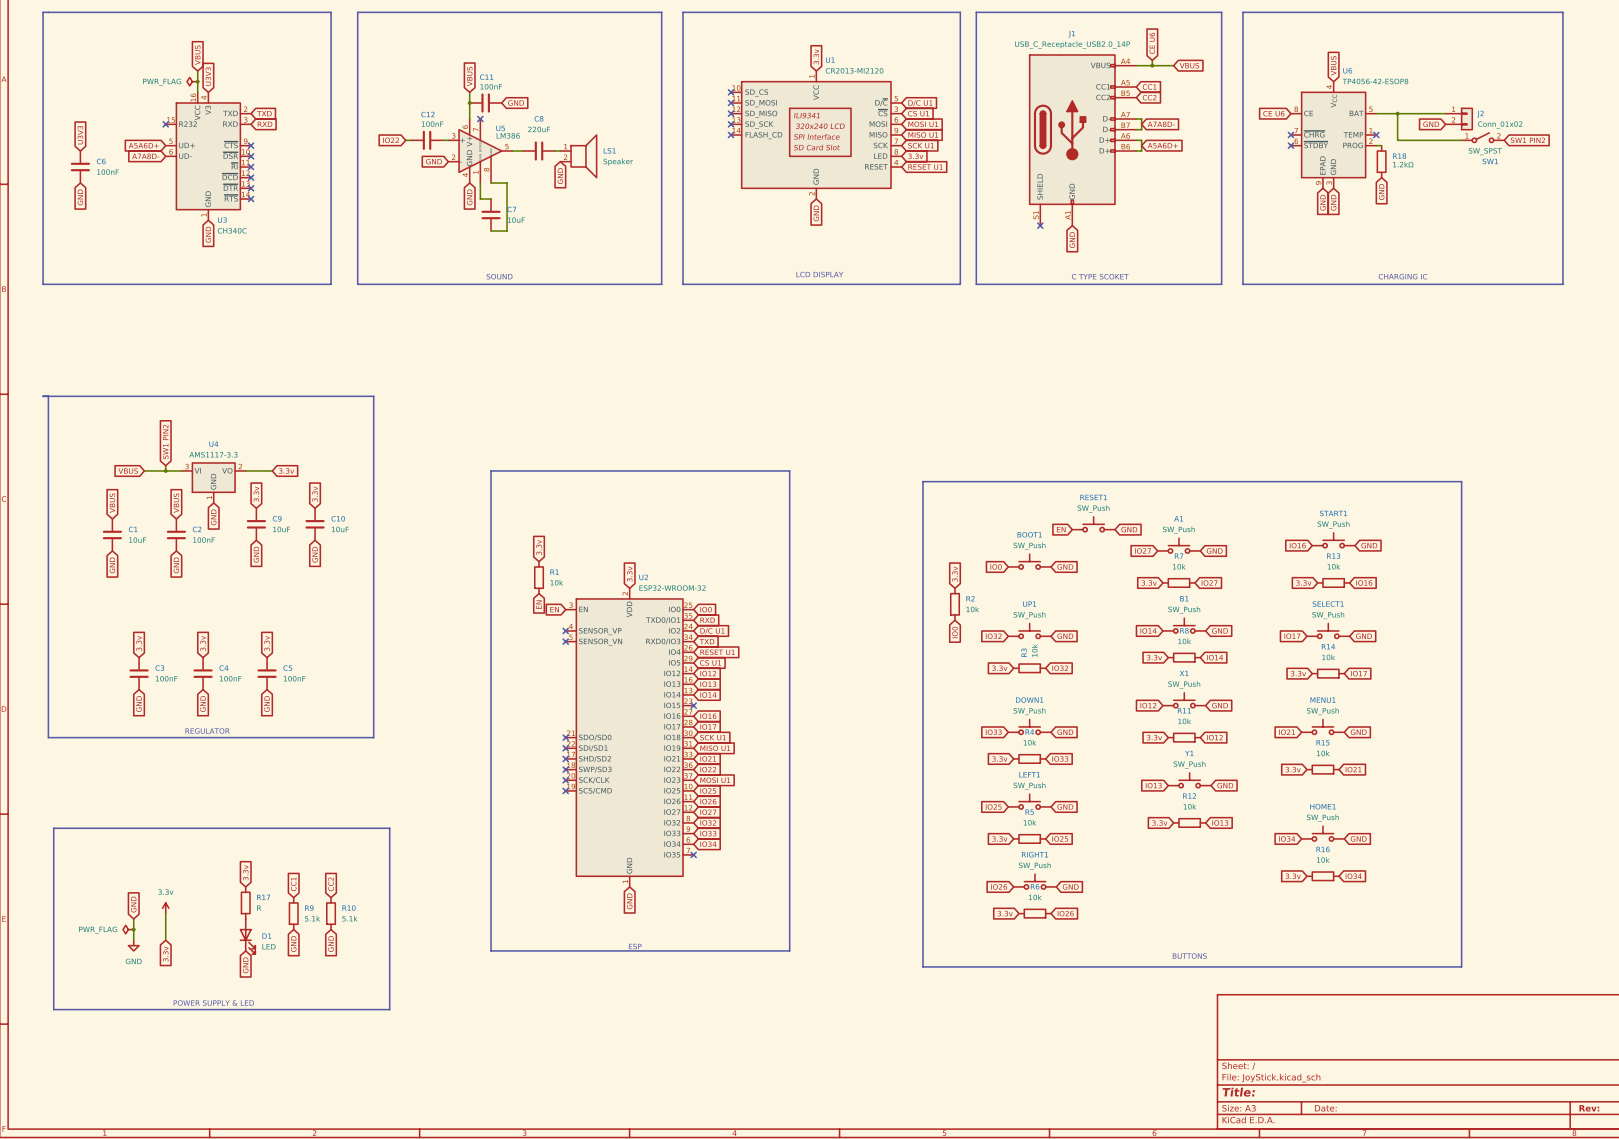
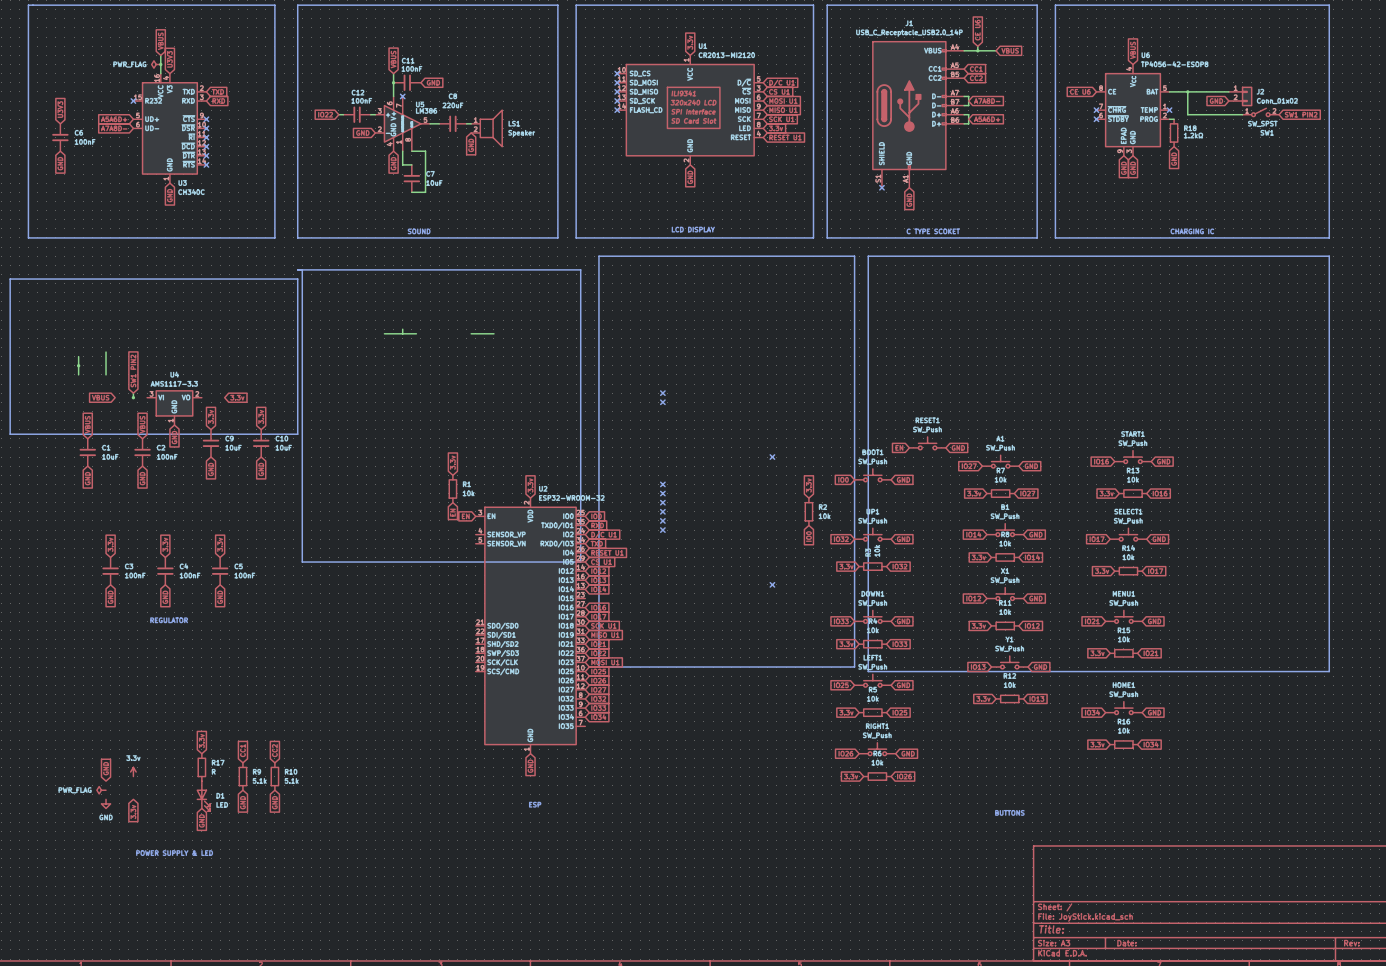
line: none -> (598, 256) (854, 256) (854, 667) (598, 667) (598, 256)
line: none -> (868, 256) (1329, 256) (1329, 671) (868, 671) (868, 256)
line: none -> (297, 269) (580, 269) (580, 562) (302, 562) (302, 269)
line: none -> (10, 279) (10, 434) (297, 434) (297, 279) (10, 279)
wire: none -> (402, 329) (402, 333)
line: (43, 396) (373, 396) (373, 737) (48, 737) (48, 396) -> none
wire: none -> (384, 333) (416, 333)
wire: none -> (471, 333) (493, 333)
wire: none -> (106, 352) (106, 374)
wire: none -> (78, 356) (78, 374)
junction: none -> (78, 365)
no-connect mark: none -> (662, 393)
wire: (144, 470) (181, 470) -> none
wire: (245, 470) (272, 470) -> none
line: (491, 470) (789, 470) (789, 950) (491, 950) (491, 470) -> none
no-connect mark: none -> (662, 402)
line: (922, 481) (922, 966) (1461, 966) (1461, 481) (922, 481) -> none
no-connect mark: none -> (772, 457)
no-connect mark: none -> (662, 484)
no-connect mark: none -> (662, 493)
no-connect mark: none -> (662, 502)
no-connect mark: none -> (662, 511)
no-connect mark: none -> (662, 520)
no-connect mark: none -> (662, 530)
no-connect mark: (565, 630) -> none
no-connect mark: (565, 641) -> none
no-connect mark: none -> (772, 584)
no-connect mark: (693, 705) -> none
no-connect mark: (565, 737) -> none
no-connect mark: (565, 748) -> none
no-connect mark: (565, 758) -> none
no-connect mark: (565, 769) -> none
no-connect mark: (565, 780) -> none
no-connect mark: (565, 790) -> none
line: (53, 828) (53, 1009) (389, 1009) (389, 828) (53, 828) -> none
no-connect mark: (693, 854) -> none
wire: (165, 913) (165, 940) -> none
wire: (133, 918) (133, 940) -> none
junction: (133, 929) -> none

